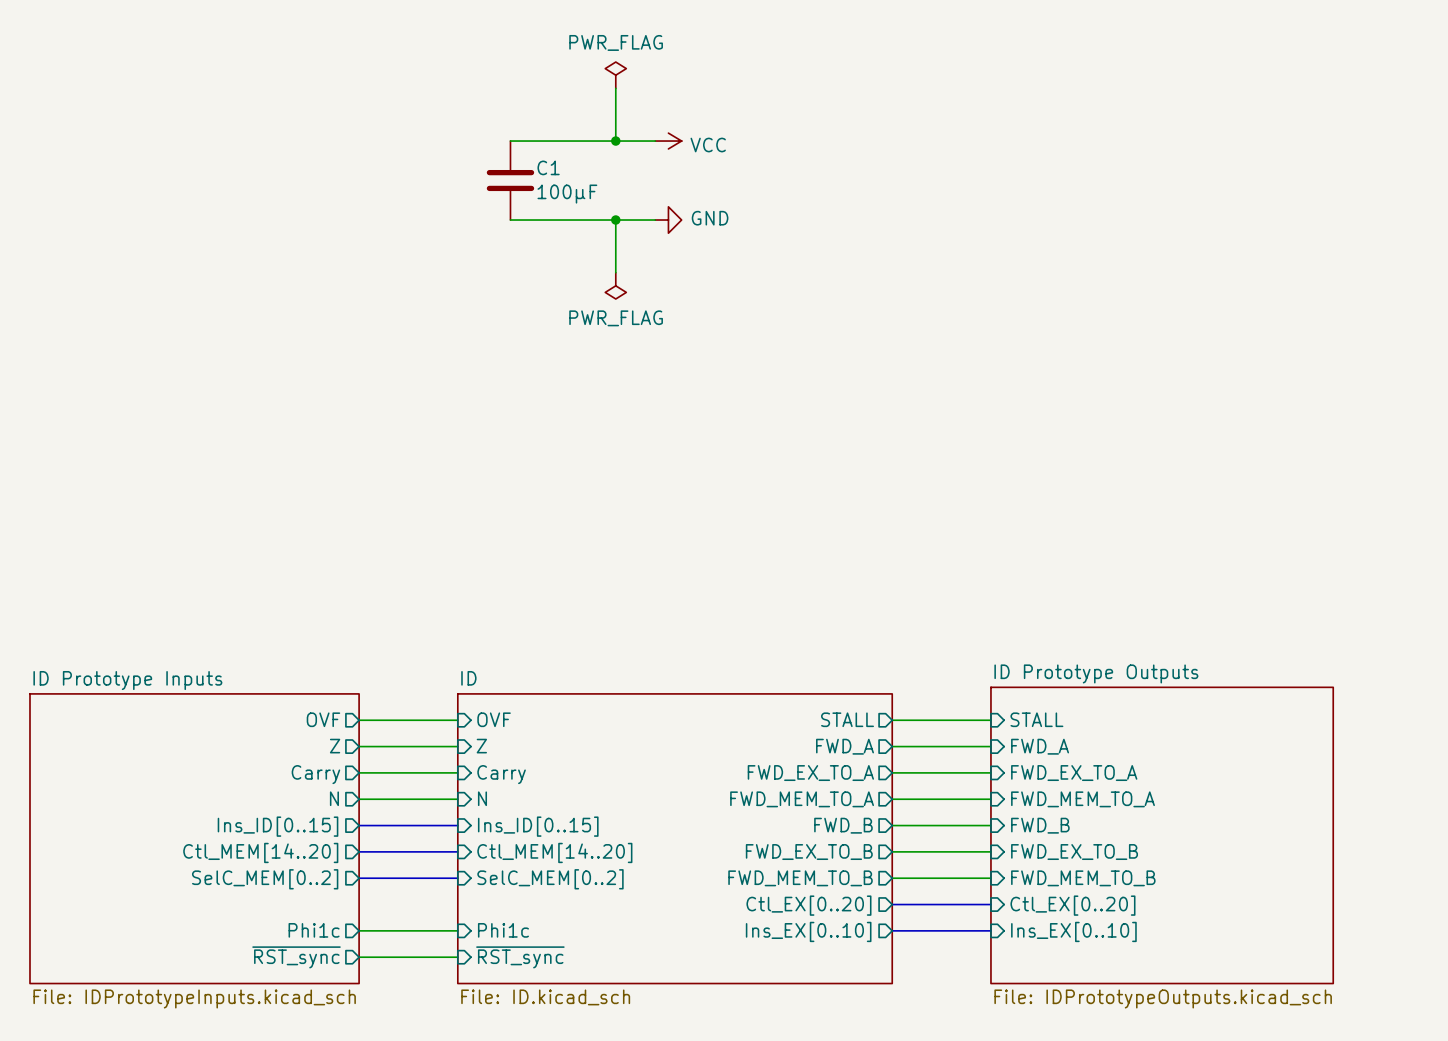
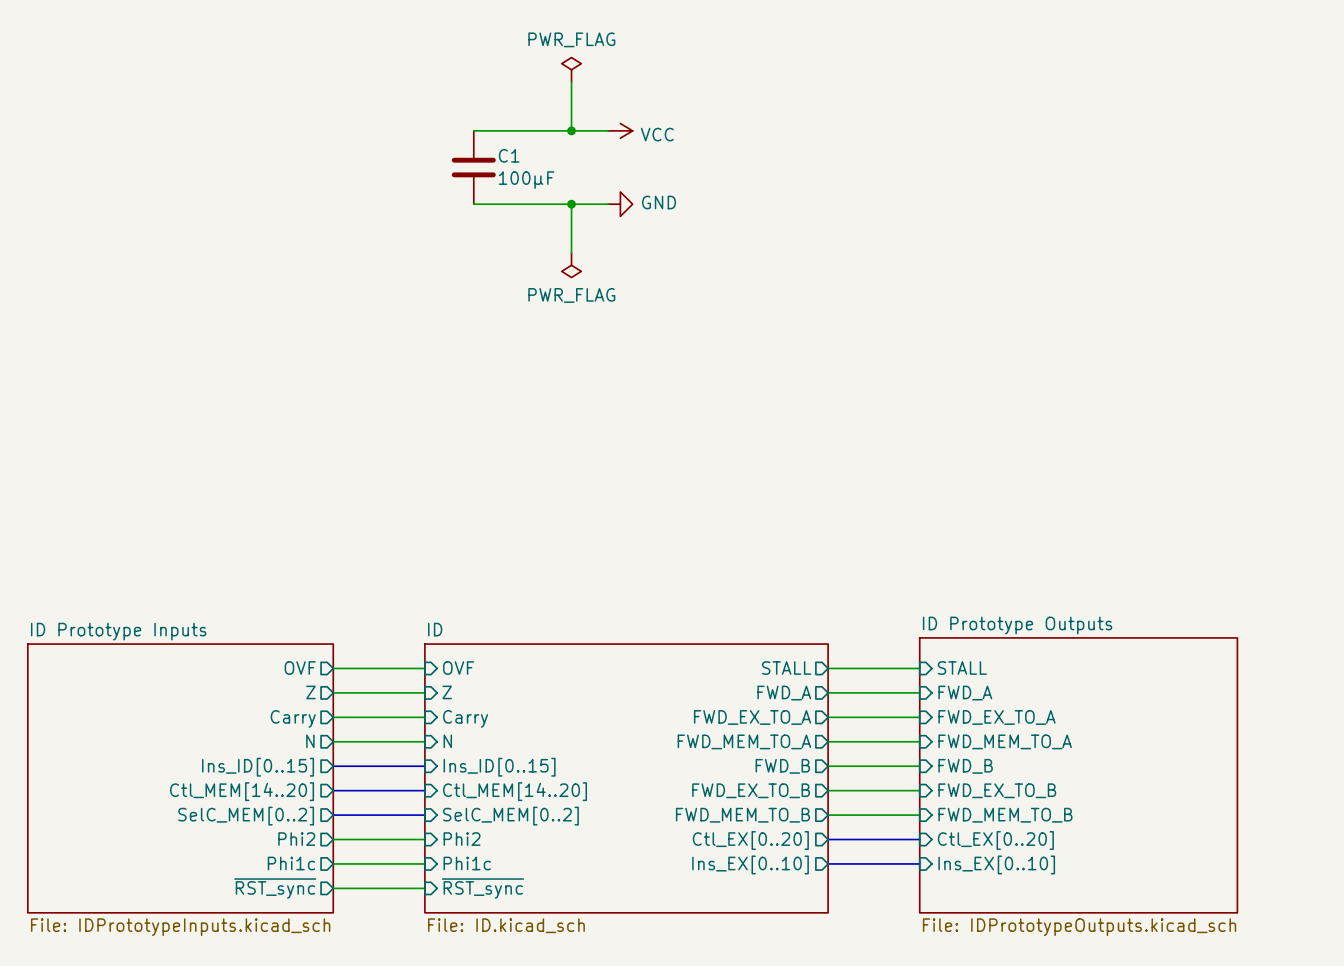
sheet pin: none -> Phi2 (296, 839)
wire: none -> (333, 839) (424, 839)
sheet pin: none -> Phi2 (462, 839)

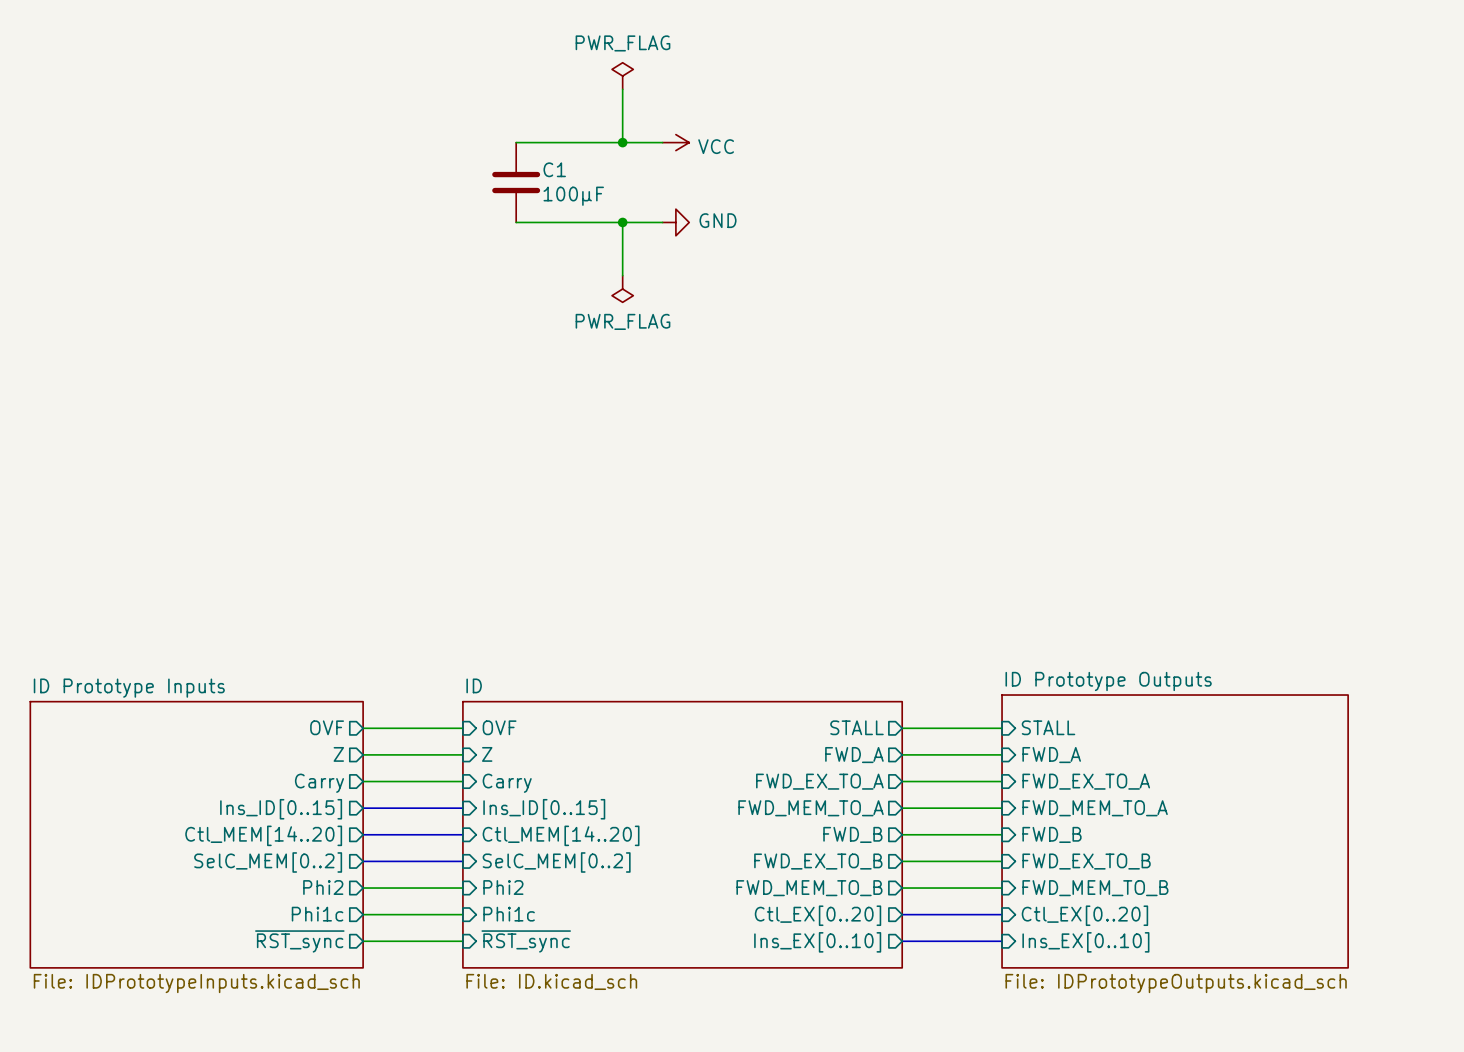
sheet pin: N (310, 741) -> Ins_ID[0..15] (281, 809)
sheet pin: N (447, 741) -> Ins_ID[0..15] (544, 809)
sheet ID Prototype Outputs: none -> File: IDPrototypeOutputs.kicad_sch (1175, 831)
sheet ID Prototype Inputs: none -> File: IDPrototypeInputs.kicad_sch (196, 834)
sheet ID: none -> File: ID.kicad_sch (682, 834)
sheet pin: Ins_ID[0..15] (258, 767) -> Ctl_MEM[14..20] (263, 835)
sheet pin: Ins_ID[0..15] (499, 767) -> Ctl_MEM[14..20] (561, 835)
sheet ID Prototype Outputs: File: IDPrototypeOutputs.kicad_sch (1078, 775) -> none
sheet ID Prototype Inputs: File: IDPrototypeInputs.kicad_sch (180, 778) -> none
sheet ID: File: ID.kicad_sch (626, 778) -> none
sheet pin: Ctl_MEM[14..20] (242, 791) -> SelC_MEM[0..2] (268, 862)
sheet pin: Ctl_MEM[14..20] (514, 791) -> SelC_MEM[0..2] (556, 862)
bus: (333, 815) (424, 815) -> (363, 808) (462, 808)
sheet pin: SelC_MEM[0..2] (246, 816) -> Phi2 (323, 887)
sheet pin: SelC_MEM[0..2] (510, 816) -> Phi2 (503, 887)
sheet pin: Phi2 (296, 839) -> Phi1c (317, 914)
sheet pin: Phi2 (462, 839) -> Phi1c (509, 914)
sheet pin: Phi1c (291, 863) -> ~{RST_sync} (299, 941)
sheet pin: Phi1c (467, 863) -> ~{RST_sync} (526, 941)
sheet pin: ~{RST_sync} (275, 888) -> none
wire: (333, 888) (424, 888) -> none
sheet pin: ~{RST_sync} (482, 888) -> none

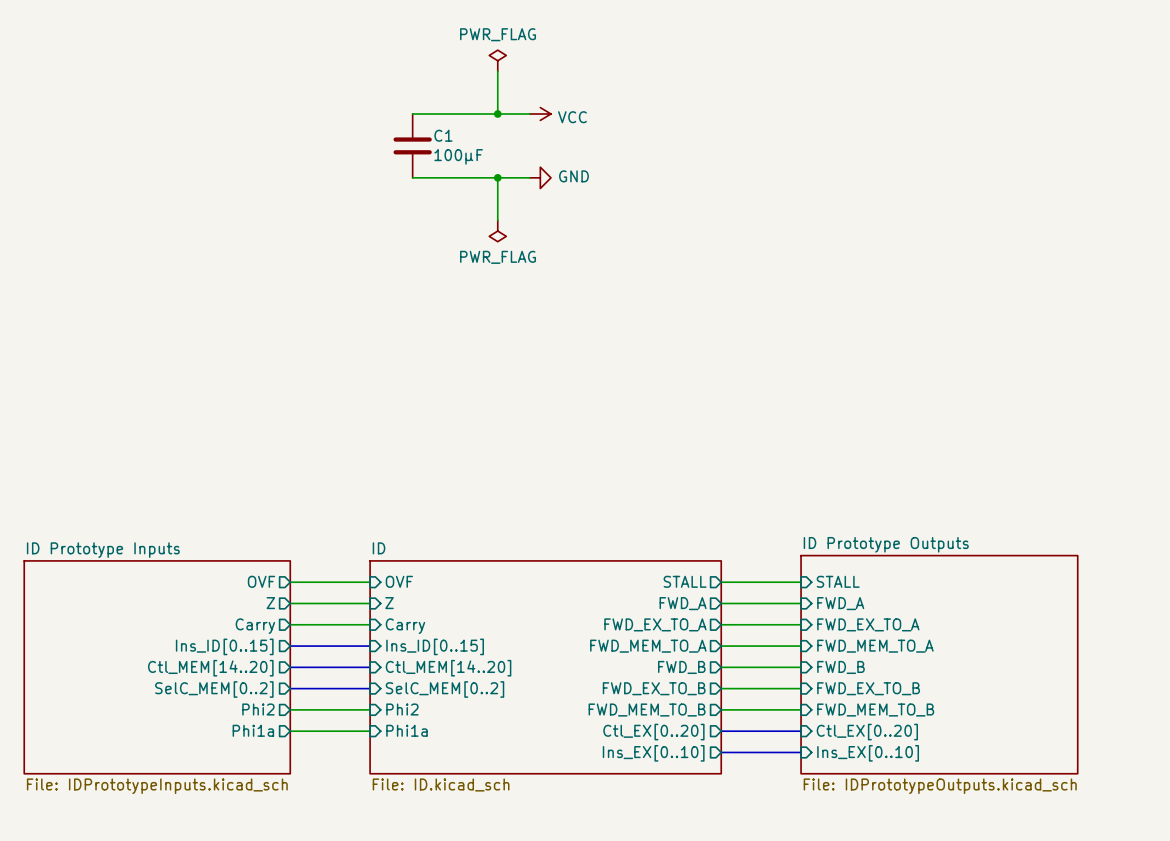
sheet pin: Phi1c (317, 914) -> Phi1a (253, 730)
sheet pin: Phi1c (509, 914) -> Phi1a (406, 730)
sheet pin: ~{RST_sync} (299, 941) -> none
wire: (363, 941) (462, 941) -> none
sheet pin: ~{RST_sync} (526, 941) -> none

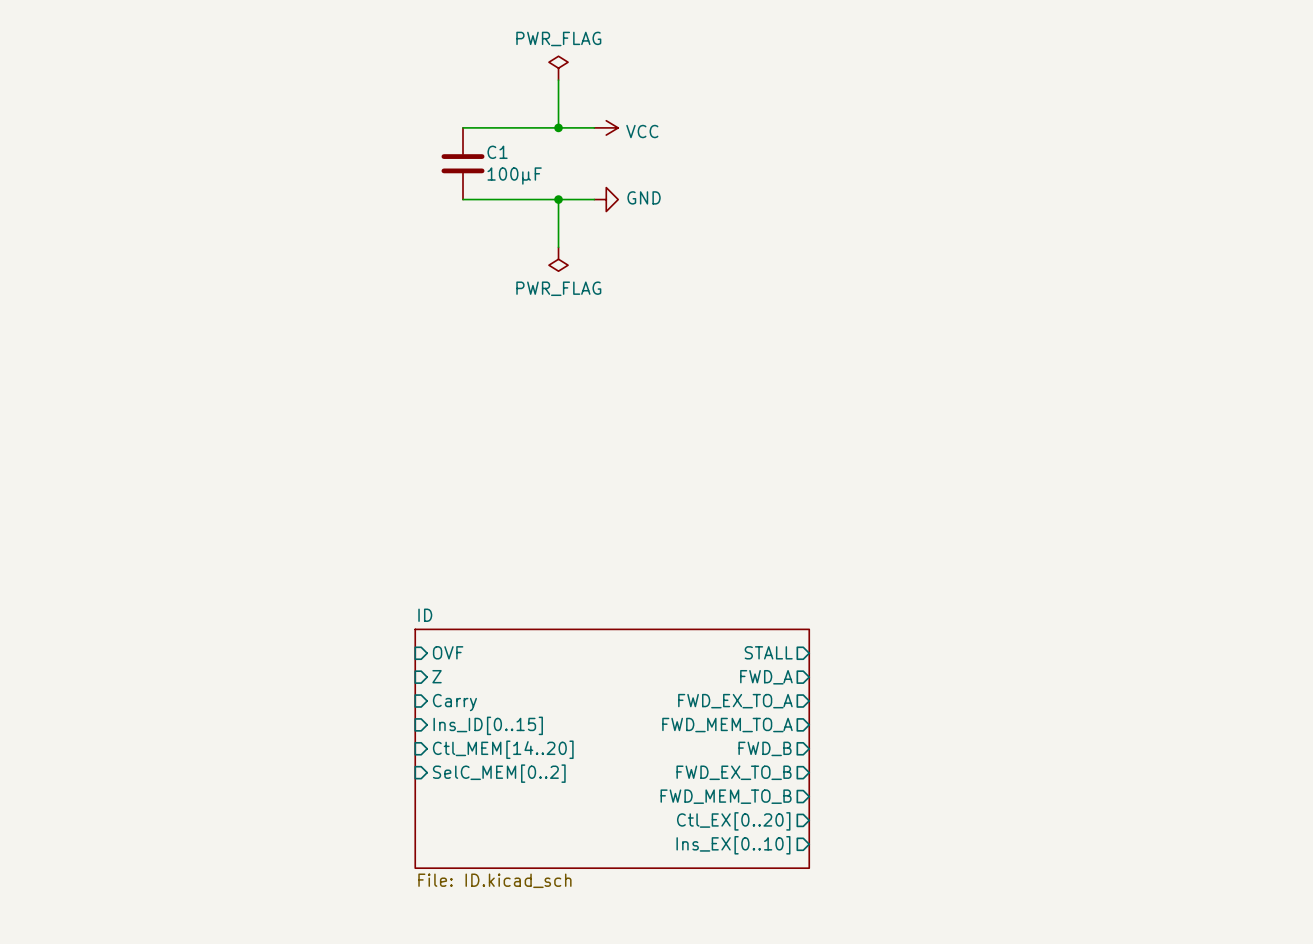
sheet pin: OVF (261, 581) -> none
sheet pin: STALL (838, 581) -> none
wire: (290, 582) (370, 582) -> none
wire: (721, 582) (801, 582) -> none
sheet pin: Z (270, 603) -> none
wire: (290, 603) (370, 603) -> none
wire: (721, 603) (801, 603) -> none
sheet pin: FWD_A (840, 603) -> none
wire: (290, 624) (370, 624) -> none
wire: (721, 624) (801, 624) -> none
sheet pin: FWD_EX_TO_A (868, 624) -> none
sheet pin: Carry (255, 626) -> none
sheet pin: Ins_ID[0..15] (224, 646) -> none
bus: (290, 646) (370, 646) -> none
wire: (721, 646) (801, 646) -> none
sheet pin: FWD_MEM_TO_A (875, 646) -> none
sheet ID Prototype Outputs: File: IDPrototypeOutputs.kicad_sch (939, 664) -> none
sheet ID Prototype Inputs: File: IDPrototypeInputs.kicad_sch (157, 667) -> none
bus: (290, 667) (370, 667) -> none
wire: (721, 667) (801, 667) -> none
sheet pin: FWD_B (840, 667) -> none
sheet pin: Ctl_MEM[14..20] (210, 668) -> none
bus: (290, 688) (370, 688) -> none
wire: (721, 688) (801, 688) -> none
sheet pin: FWD_EX_TO_B (868, 688) -> none
sheet pin: SelC_MEM[0..2] (214, 689) -> none
sheet pin: Phi2 (258, 709) -> none
wire: (290, 709) (370, 709) -> none
sheet pin: Phi2 (402, 709) -> none
wire: (721, 709) (801, 709) -> none
sheet pin: FWD_MEM_TO_B (875, 710) -> none
sheet pin: Phi1a (253, 730) -> none
sheet pin: Phi1a (406, 730) -> none
wire: (290, 731) (370, 731) -> none
bus: (721, 731) (801, 731) -> none
sheet pin: Ctl_EX[0..20] (867, 732) -> none
bus: (721, 752) (801, 752) -> none
sheet pin: Ins_EX[0..10] (868, 753) -> none

